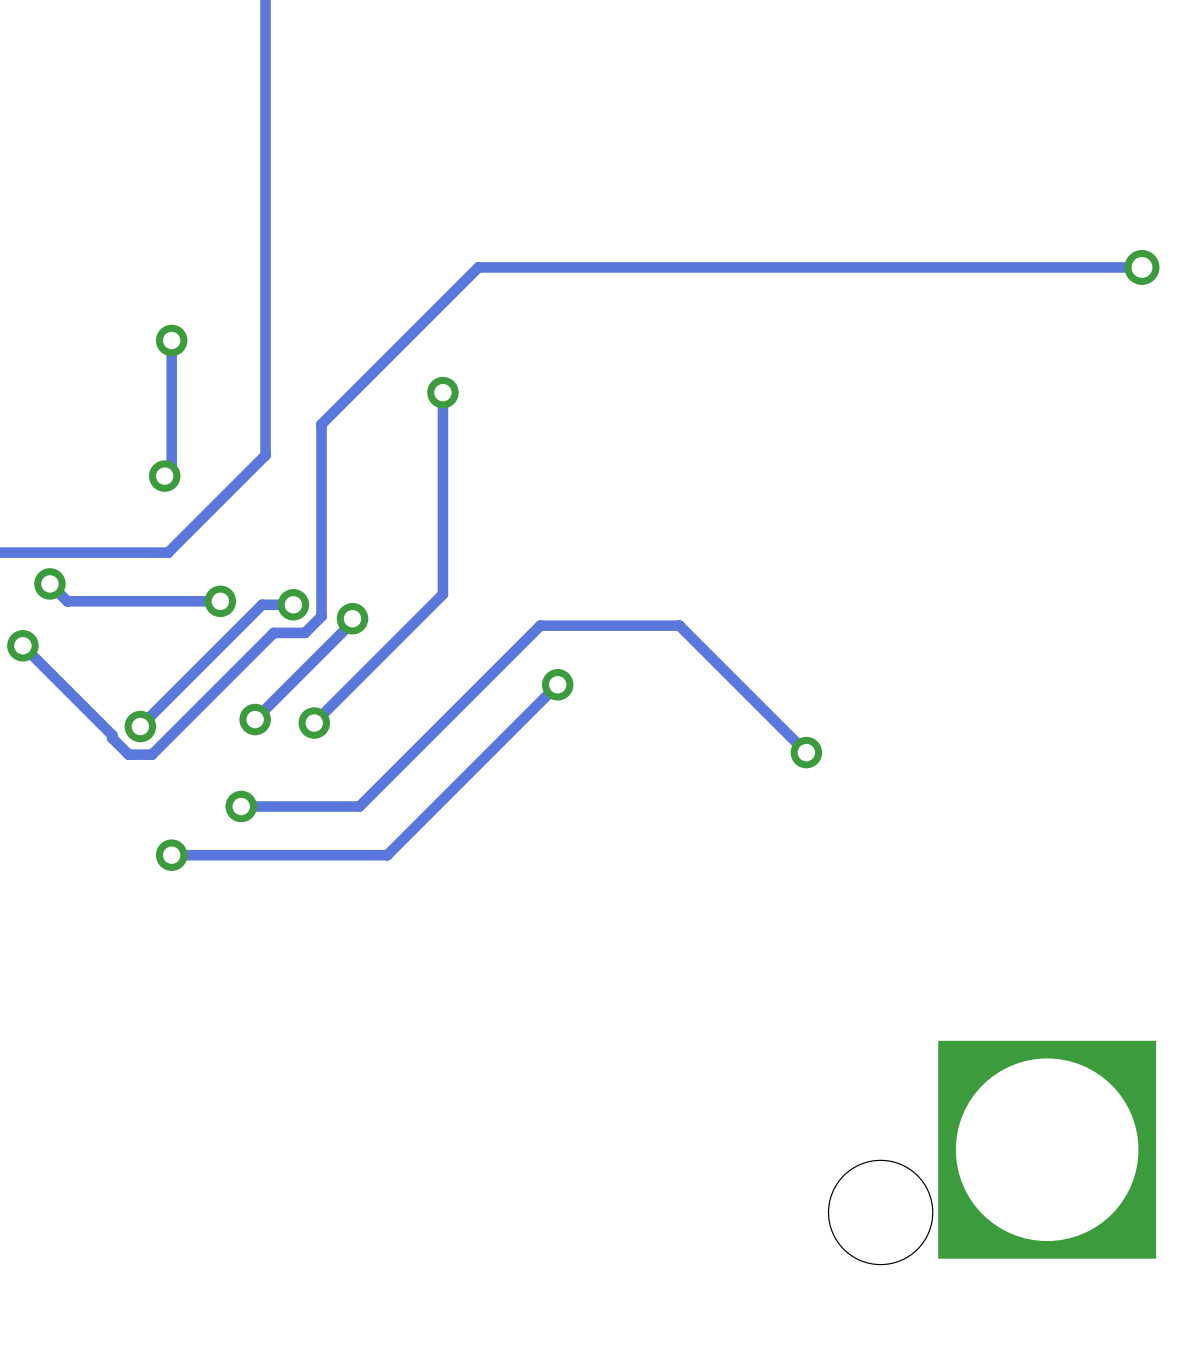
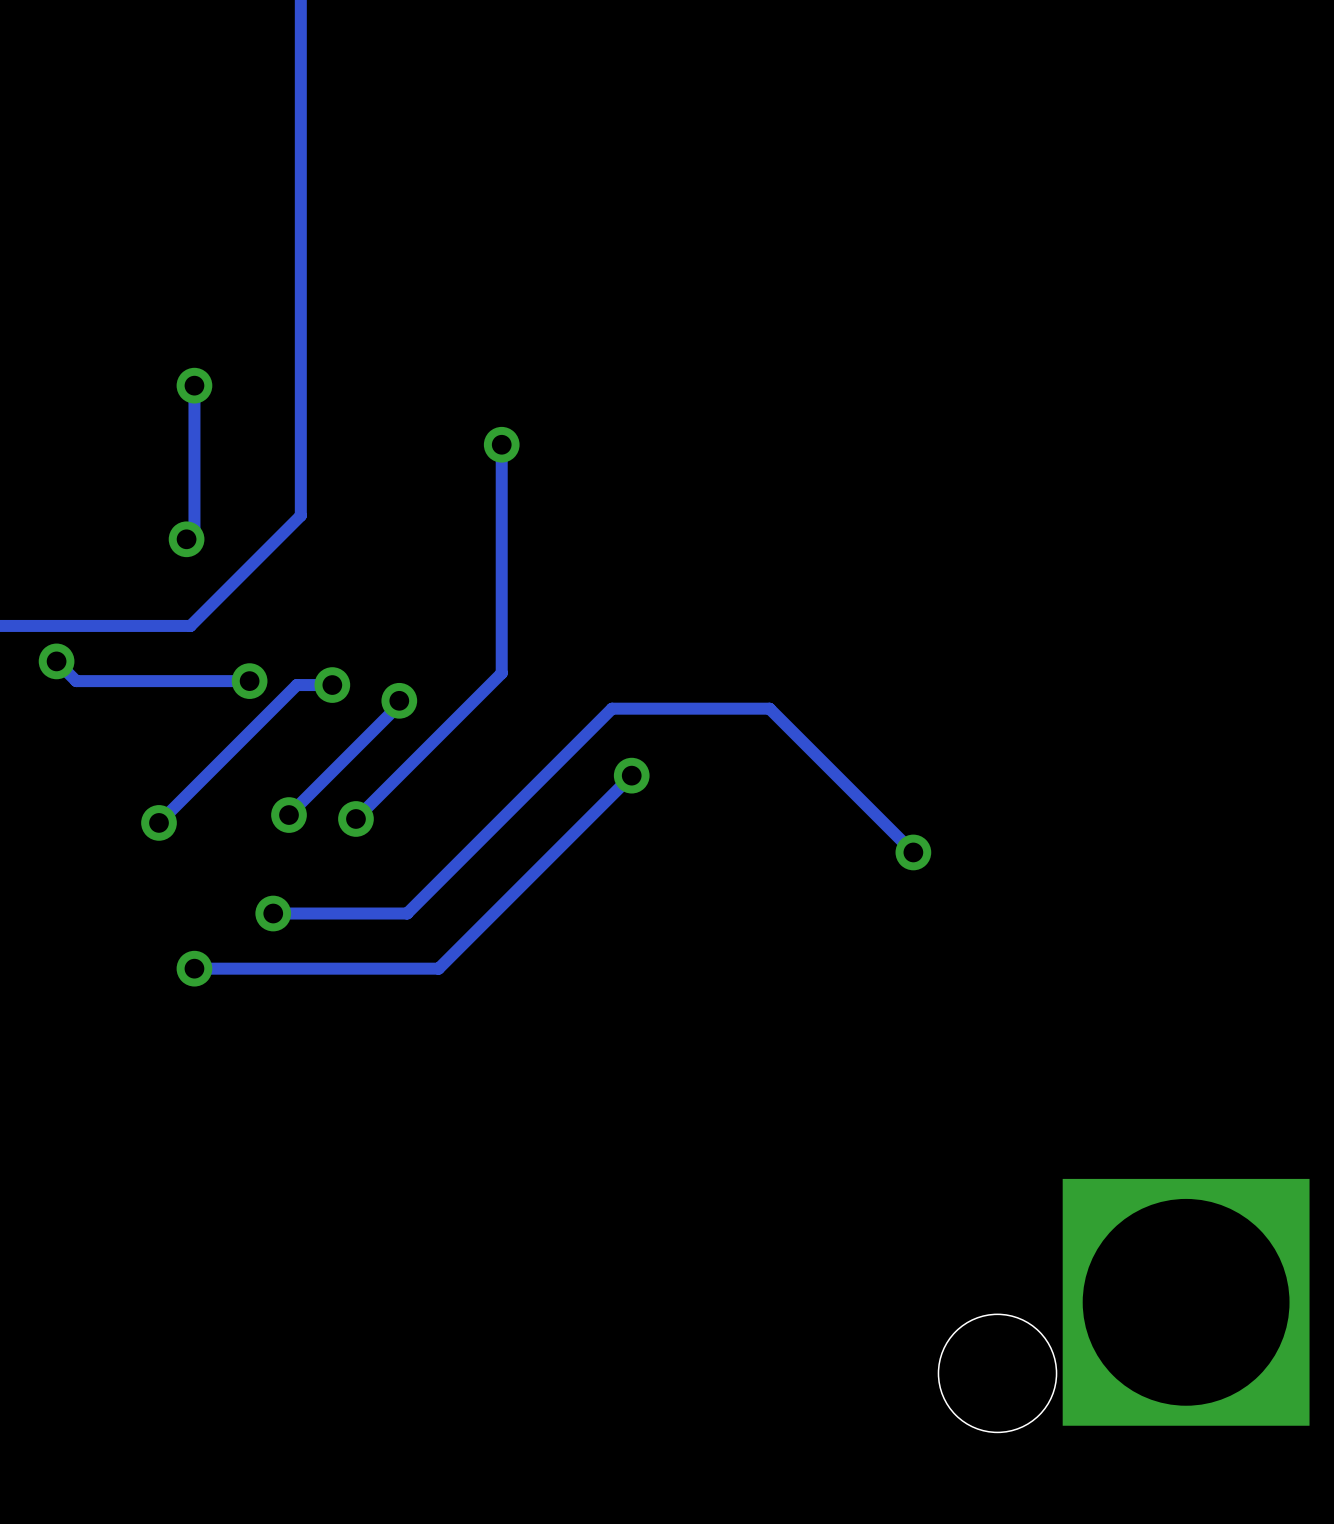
track: (1141, 267) (478, 267) (321, 424) (321, 616) (305, 632) (273, 632) (152, 754) (128, 754) (112, 738) (112, 735) (22, 645) -> none
via: (1141, 267) -> none
via: (22, 645) -> none

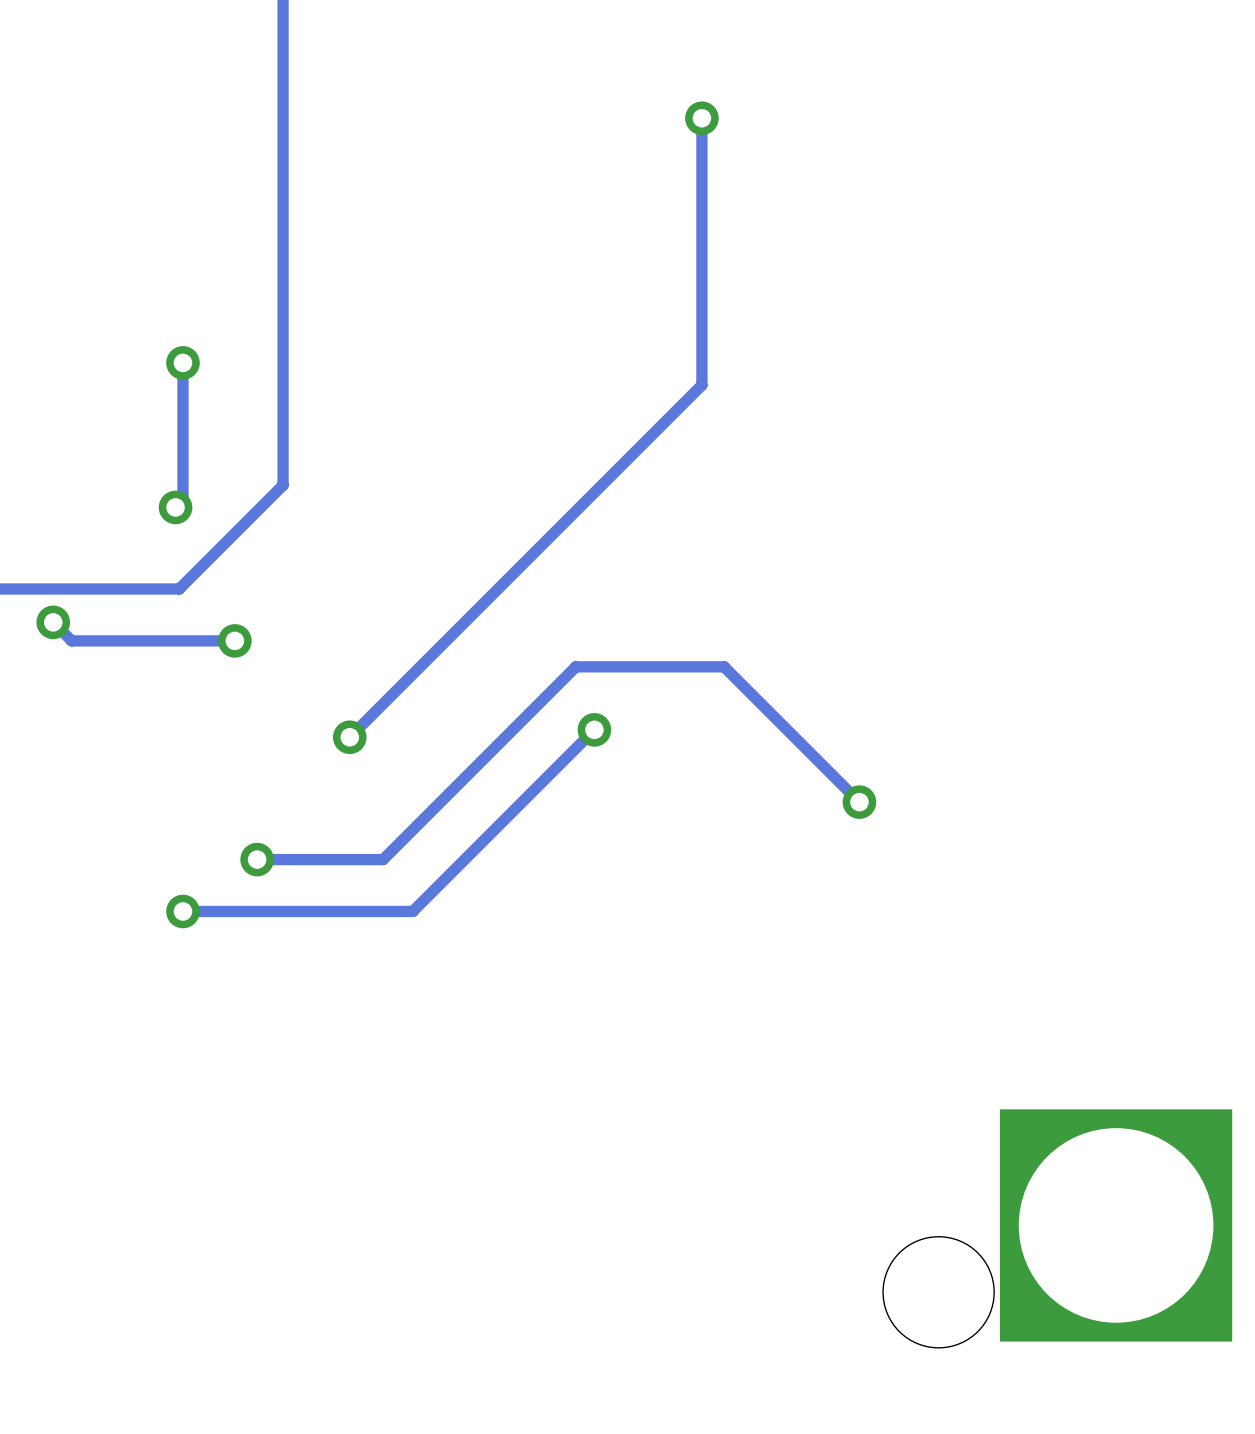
track: none -> (701, 118) (701, 385) (349, 737)
via: none -> (701, 118)
track: (501, 444) (501, 673) (355, 818) -> none
via: (501, 444) -> none
track: (332, 685) (296, 685) (159, 822) -> none
via: (332, 685) -> none
track: (399, 700) (399, 704) (289, 815) -> none
via: (399, 700) -> none
via: (289, 815) -> none
via position: (355, 818) -> (349, 737)
via: (159, 822) -> none

